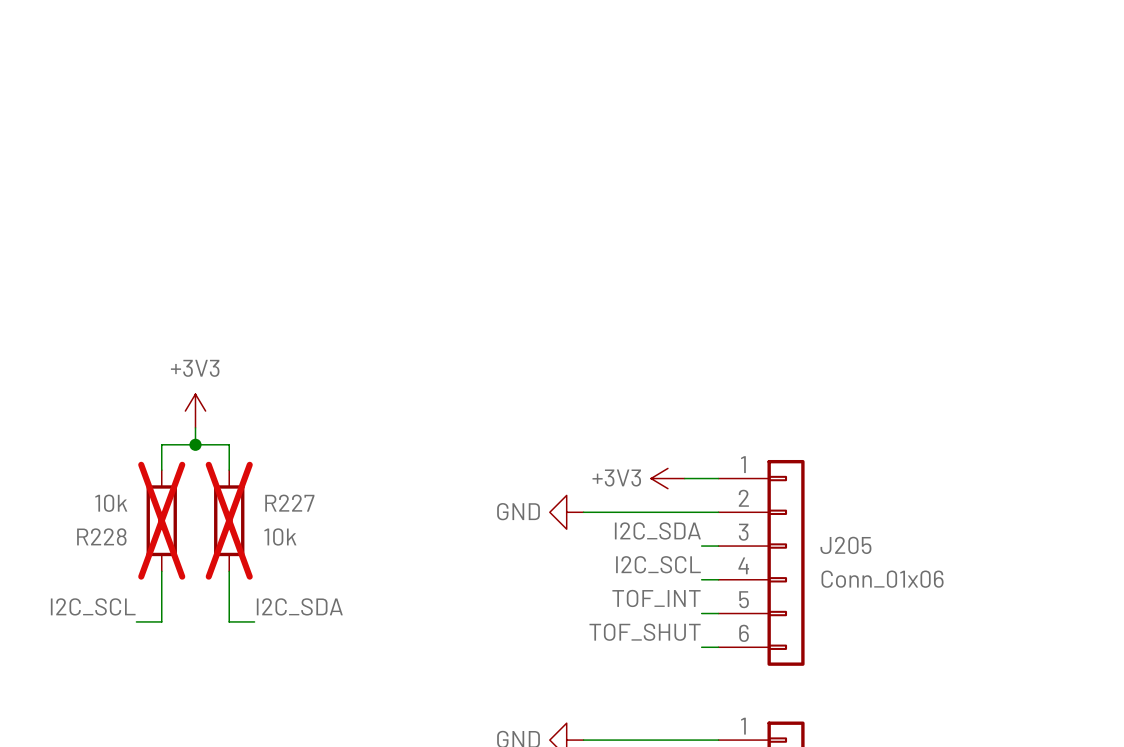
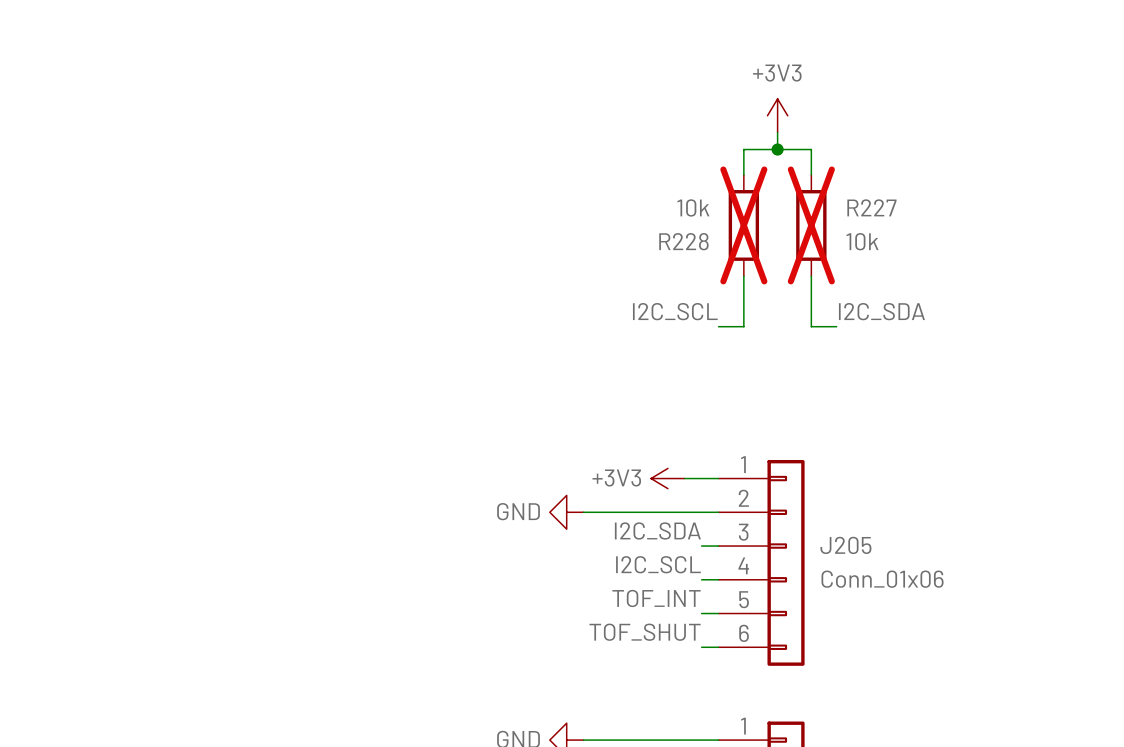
power symbol: none -> +3V3 (777, 115)
wire: none -> (777, 132) (777, 149)
junction: none -> (777, 149)
wire: none -> (743, 174) (743, 149) (811, 149) (811, 174)
wire: none -> (743, 276) (743, 326) (718, 326)
wire: none -> (811, 276) (811, 326) (836, 326)
label: none -> I2C_SCL (675, 311)
label: none -> I2C_SDA (881, 311)
power symbol: +3V3 (195, 411) -> none
wire: (195, 427) (195, 444) -> none
junction: (195, 444) -> none
wire: (161, 470) (161, 444) (229, 444) (229, 470) -> none
R228 position: (161, 520) -> (743, 225)
R227 position: (229, 520) -> (811, 225)
wire: (161, 571) (161, 621) (136, 621) -> none
wire: (229, 571) (229, 621) (254, 621) -> none
label: I2C_SCL (93, 606) -> none
label: I2C_SDA (299, 606) -> none

